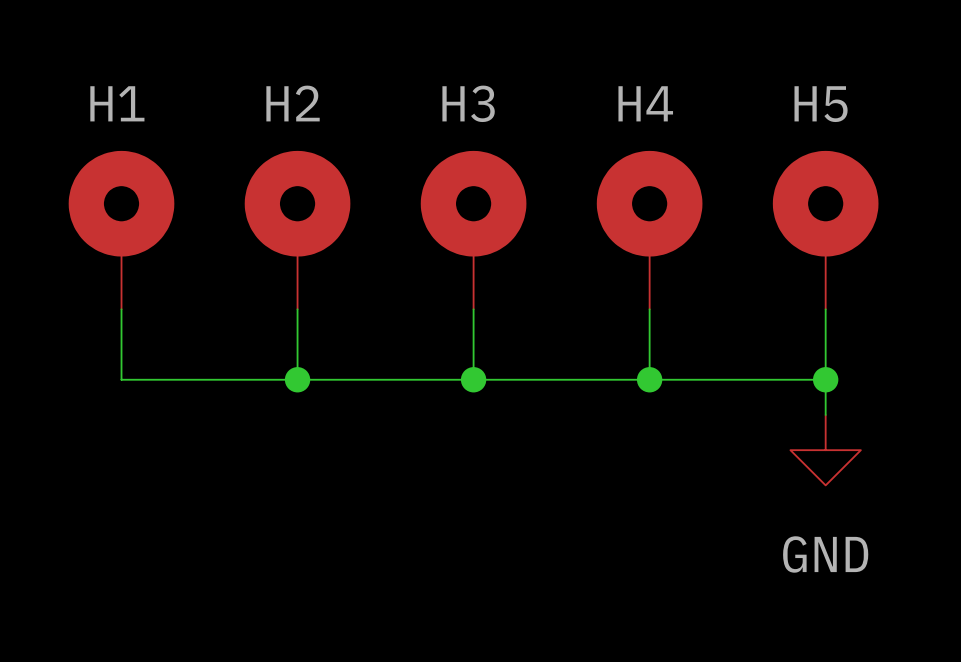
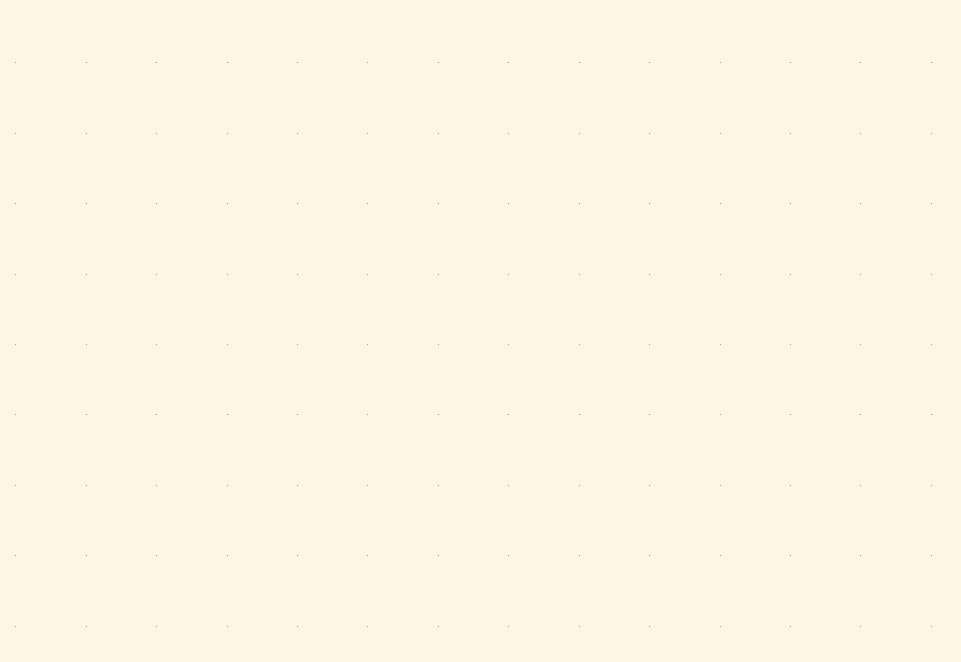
H1: (121, 230) -> none
H2: (297, 230) -> none
H3: (473, 230) -> none
H4: (649, 230) -> none
H5: (825, 230) -> none
wire: (121, 309) (121, 379) (825, 379) -> none
wire: (297, 309) (297, 379) -> none
wire: (473, 309) (473, 379) -> none
wire: (649, 309) (649, 379) -> none
wire: (825, 309) (825, 414) -> none
junction: (297, 379) -> none
junction: (473, 379) -> none
junction: (649, 379) -> none
junction: (825, 379) -> none
power symbol: GND (825, 450) -> none

